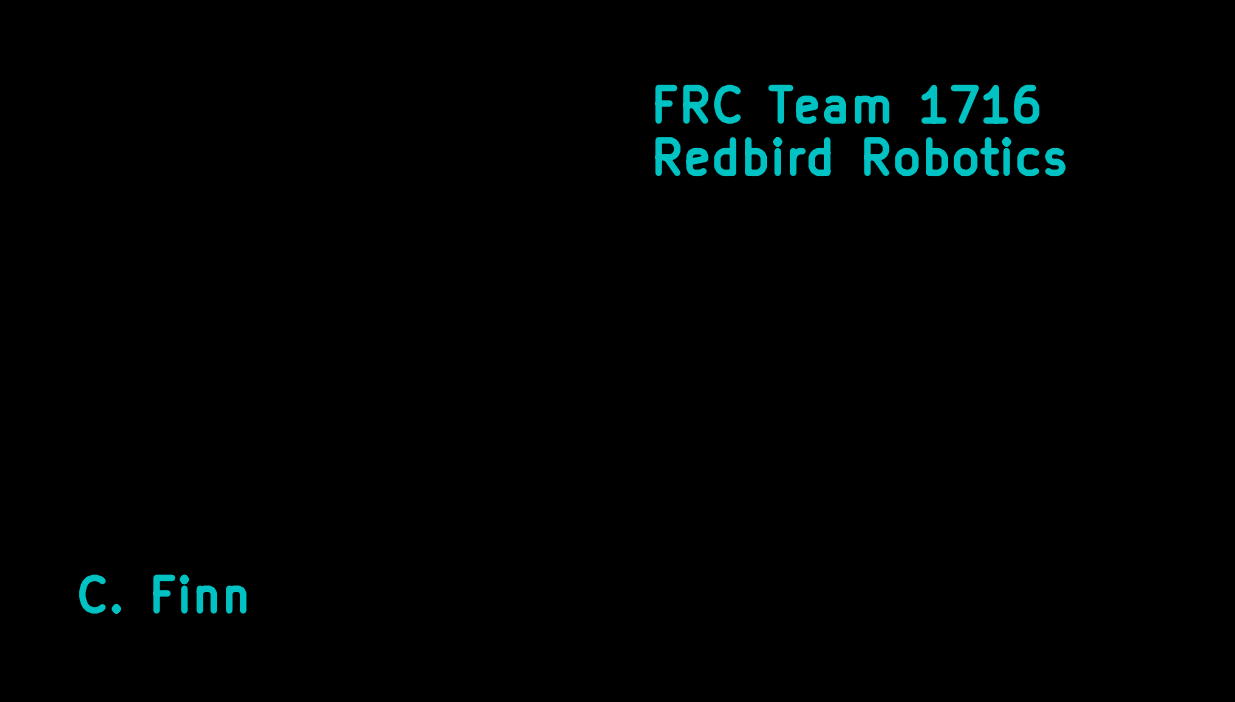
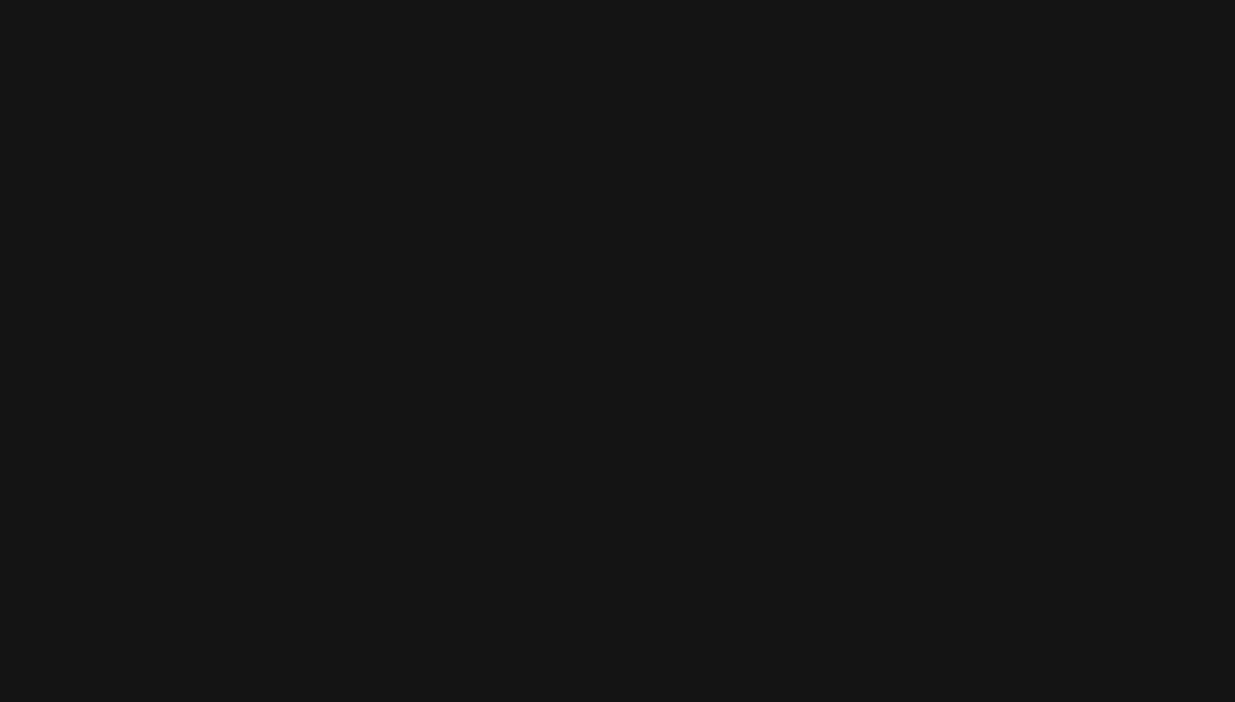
text: FRC Team 1716 (847, 104) -> none
text: Redbird Robotics (860, 156) -> none
text: C. Finn (162, 594) -> none

